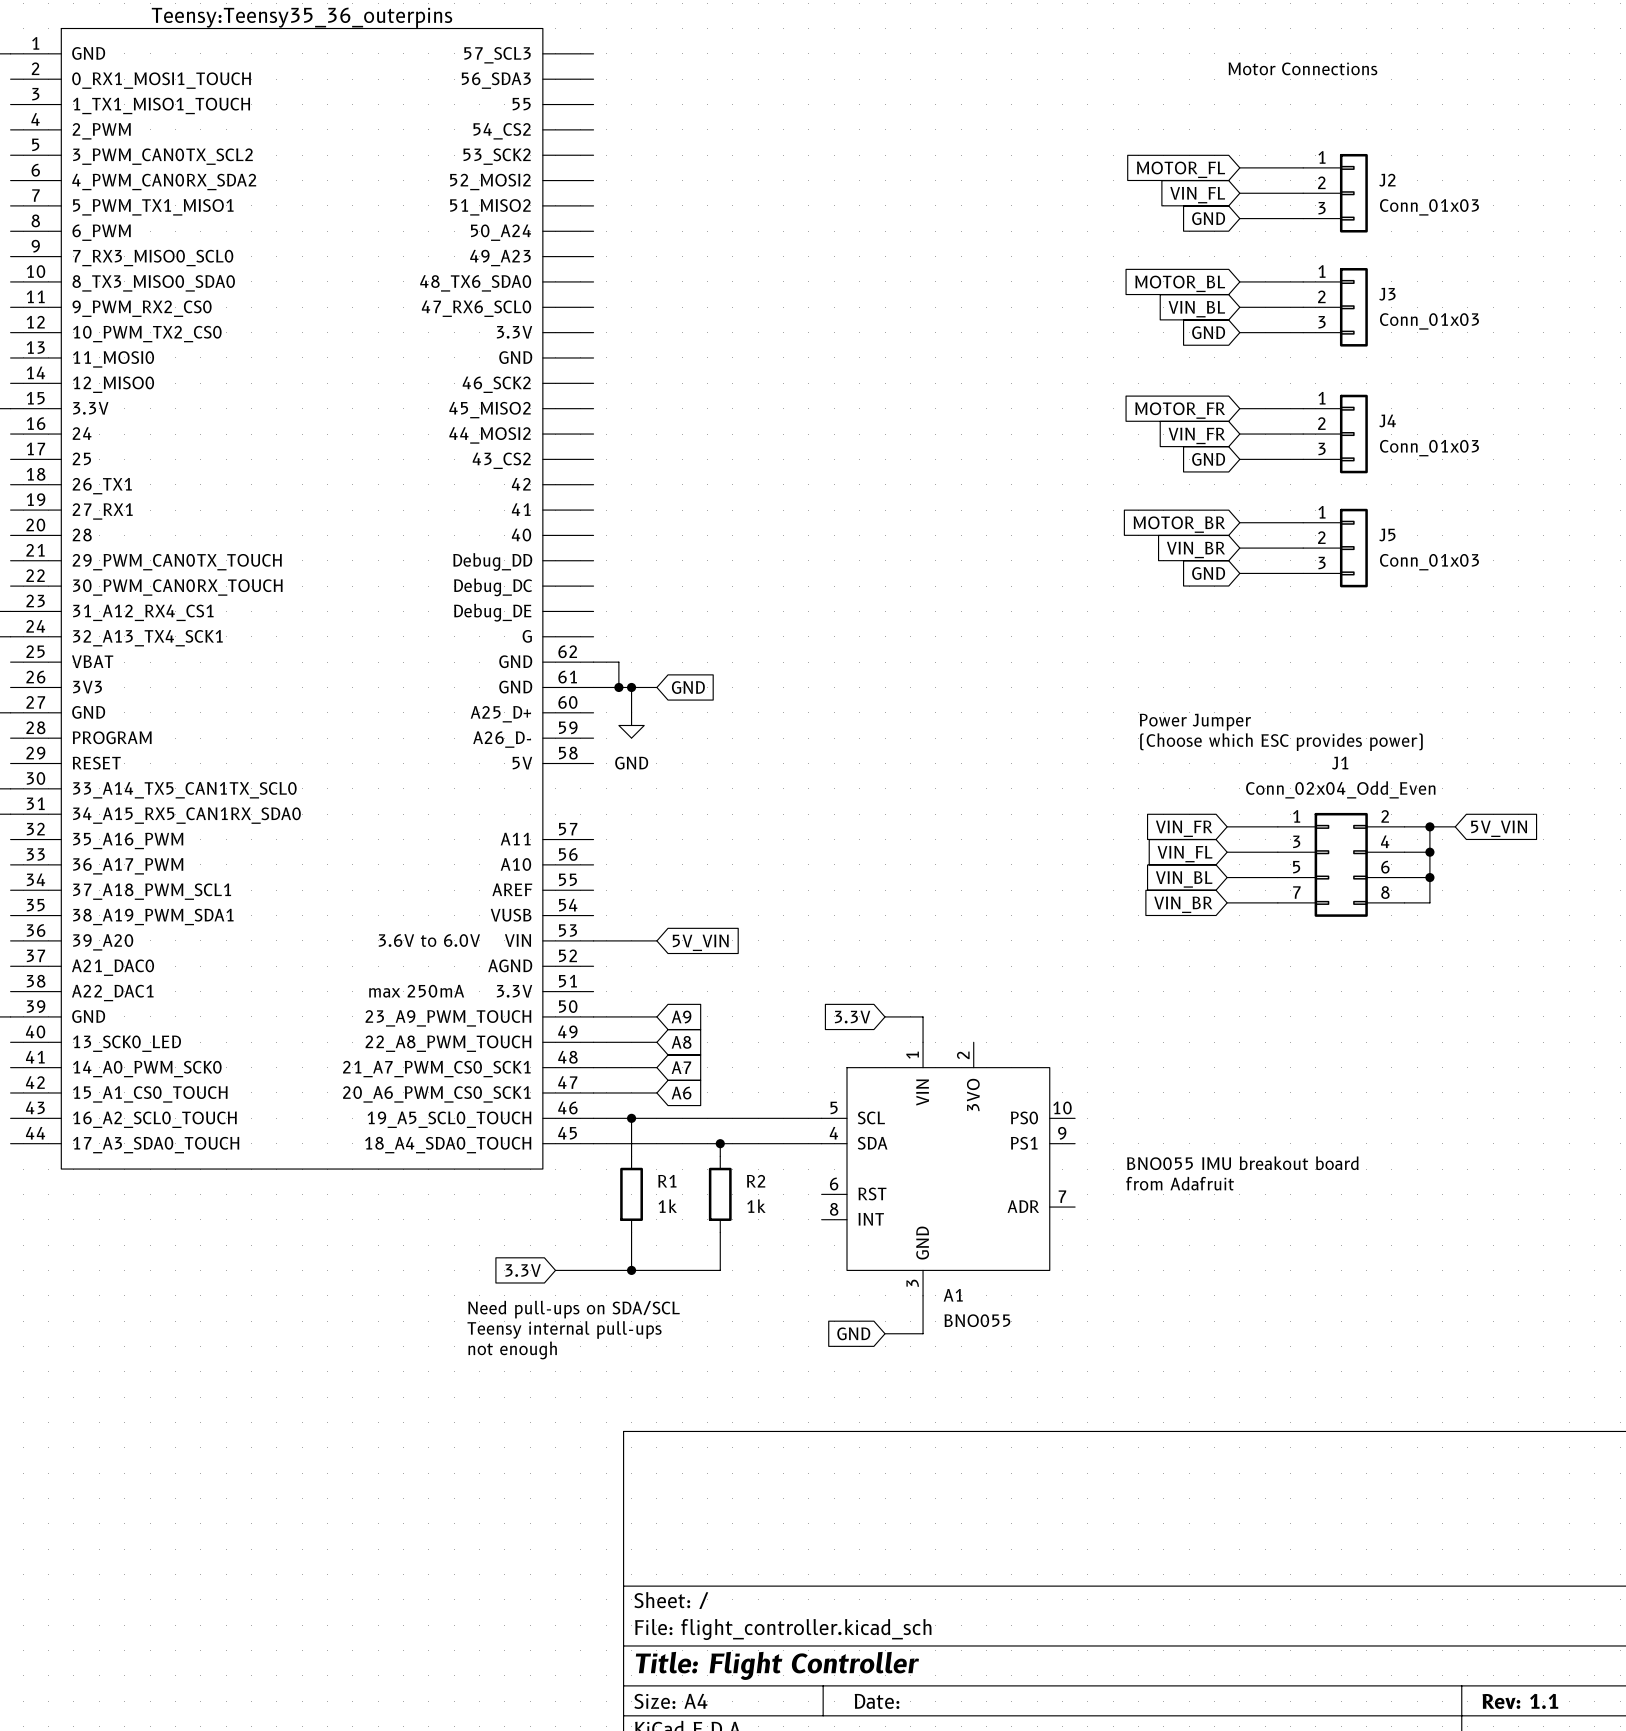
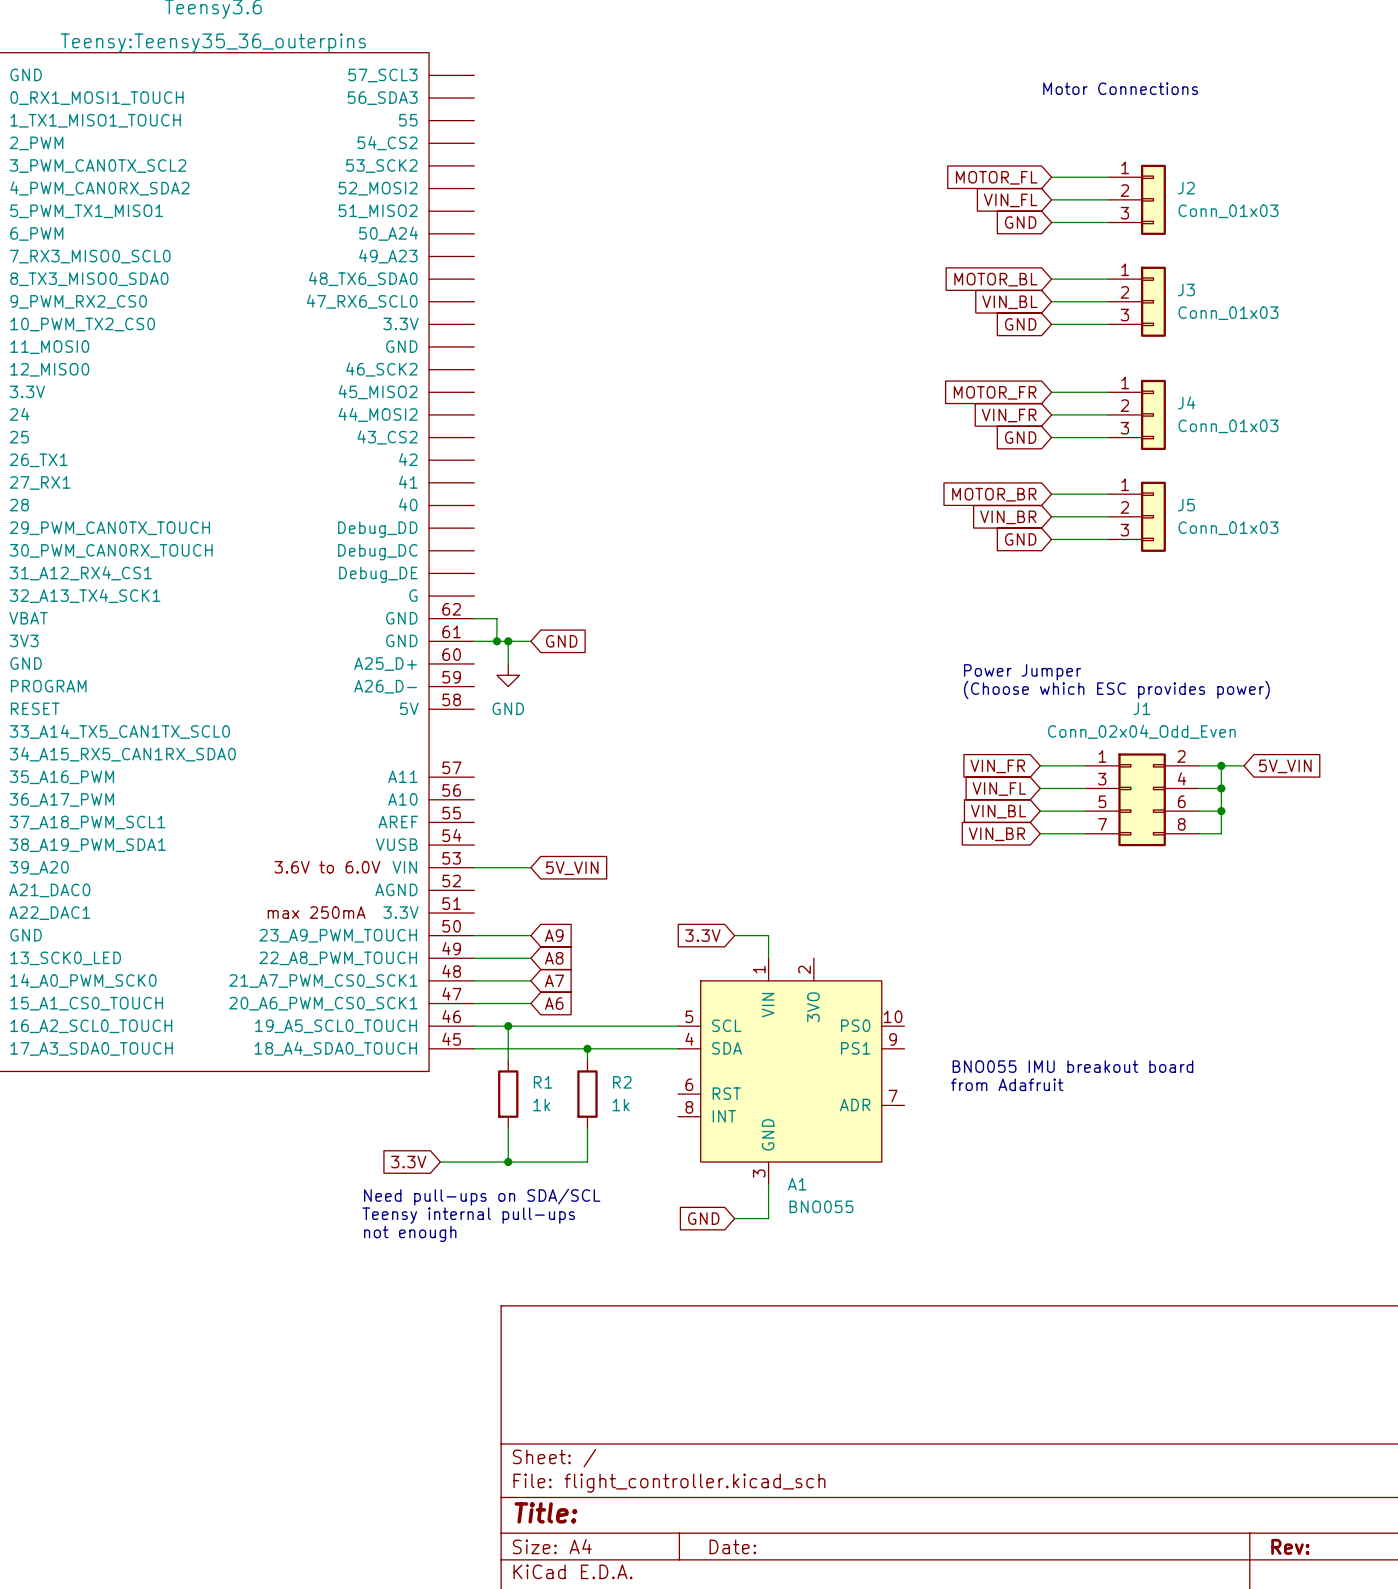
title block: Title: Flight Controller (777, 1665) -> Title: (545, 1512)
title block: Rev: 1.1 (1520, 1701) -> Rev: (1290, 1546)

